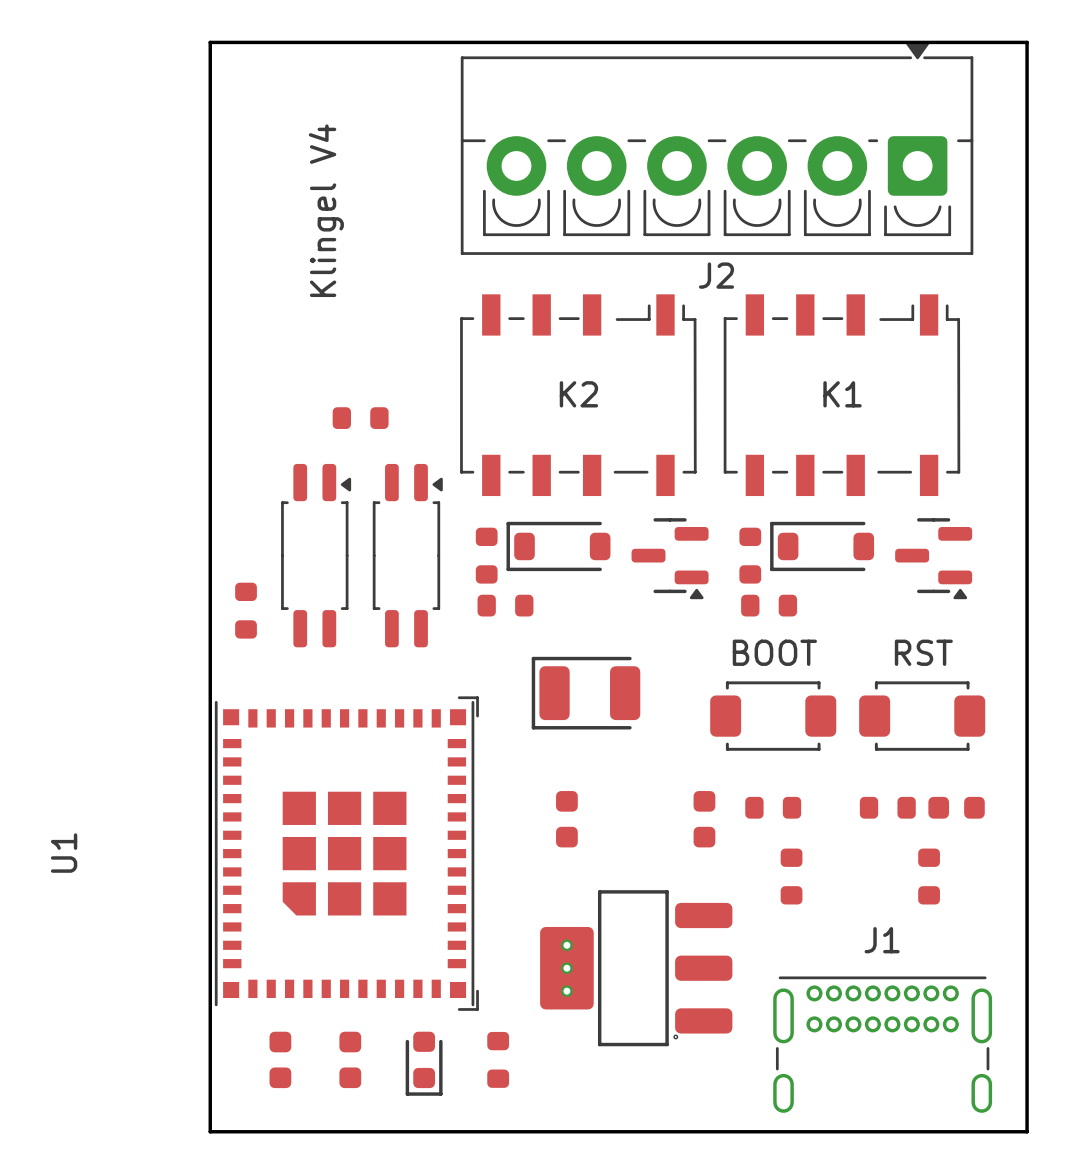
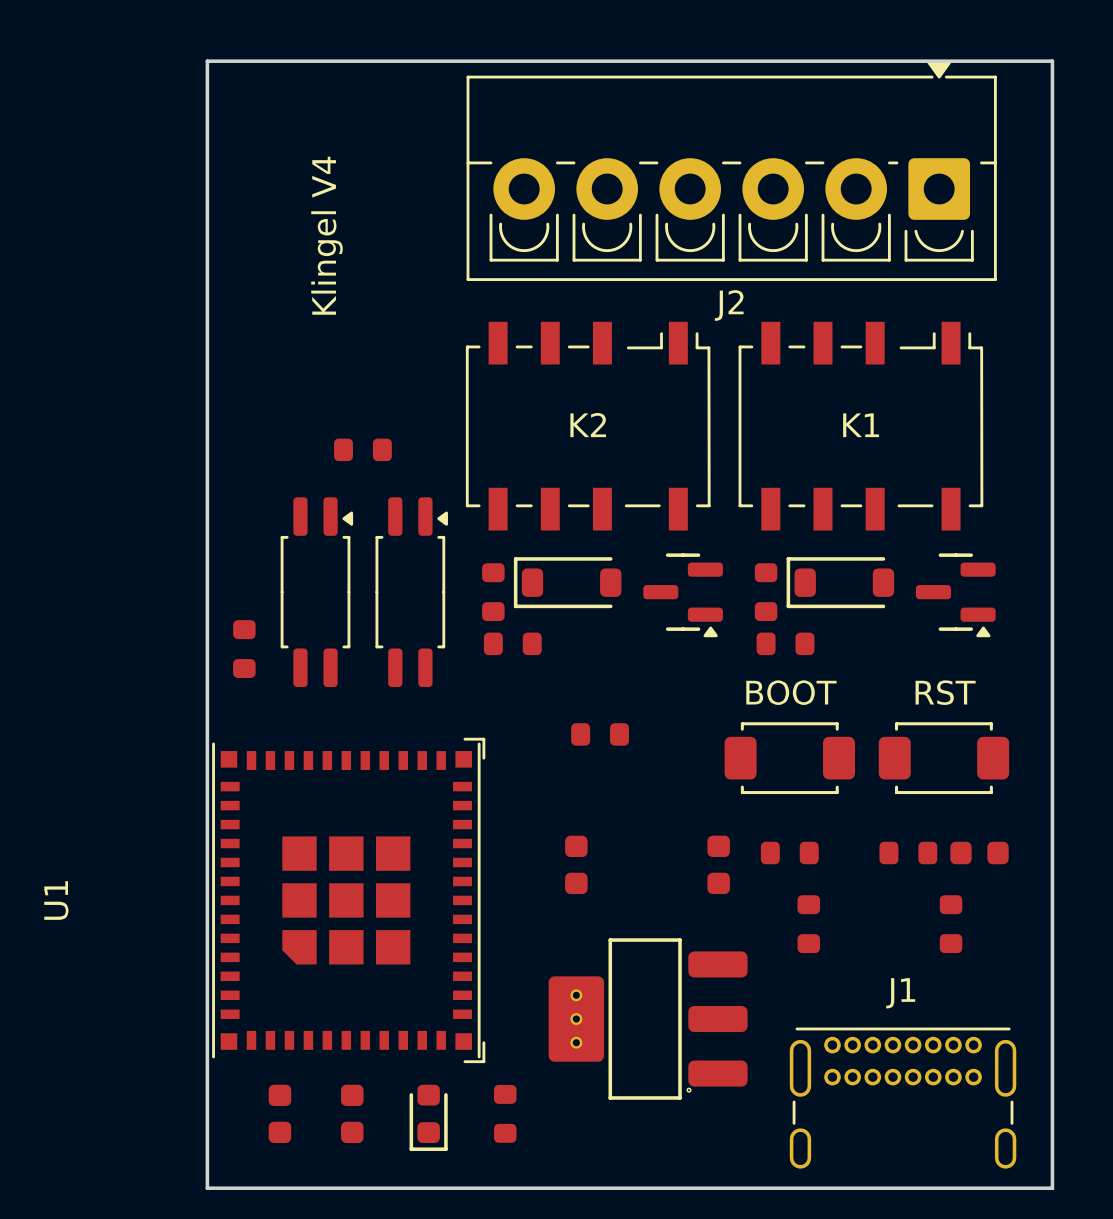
part footprint: [531, 656, 641, 730] -> [571, 723, 630, 746]

